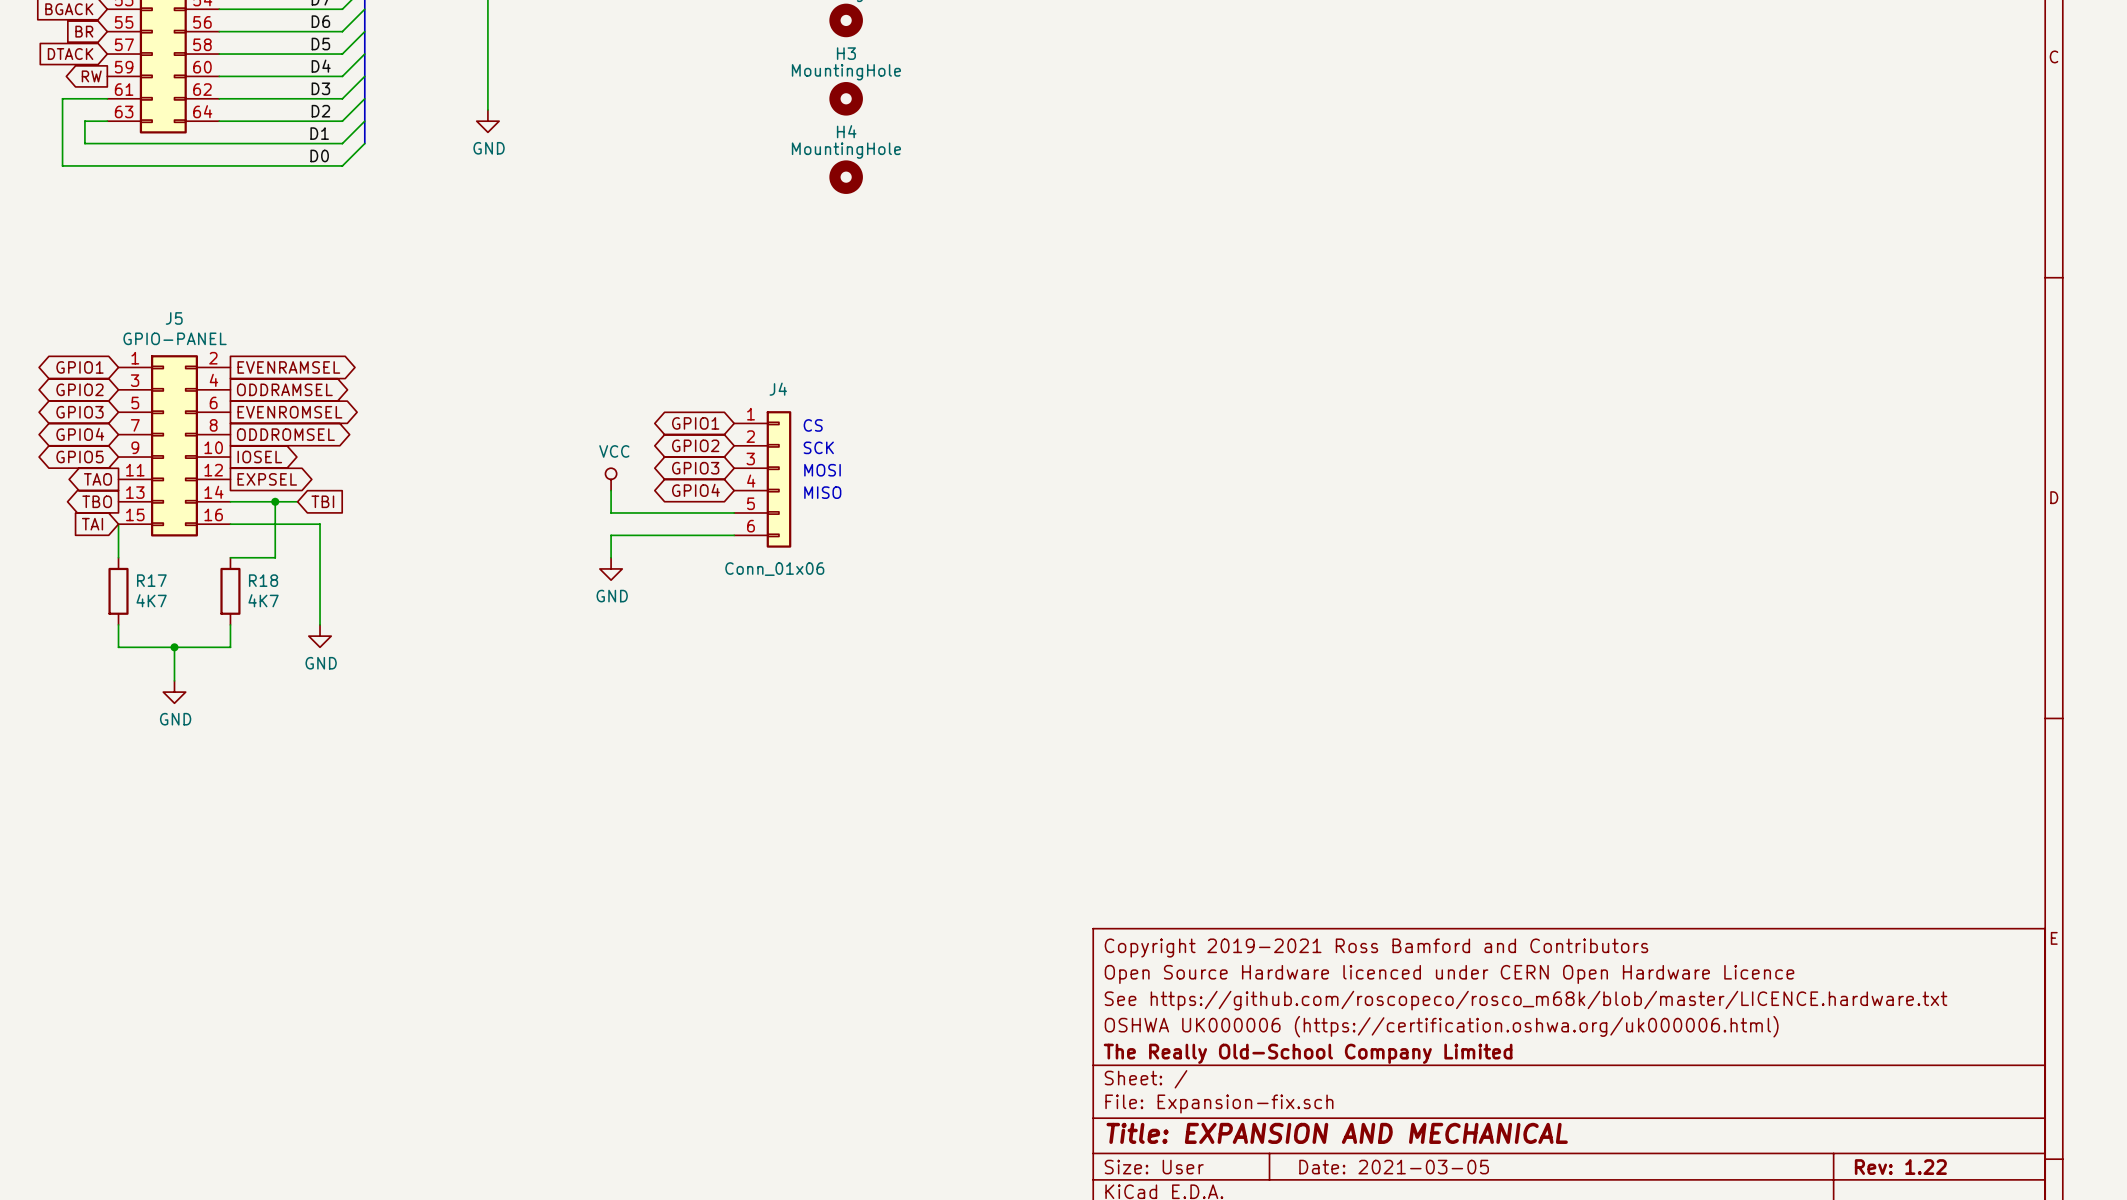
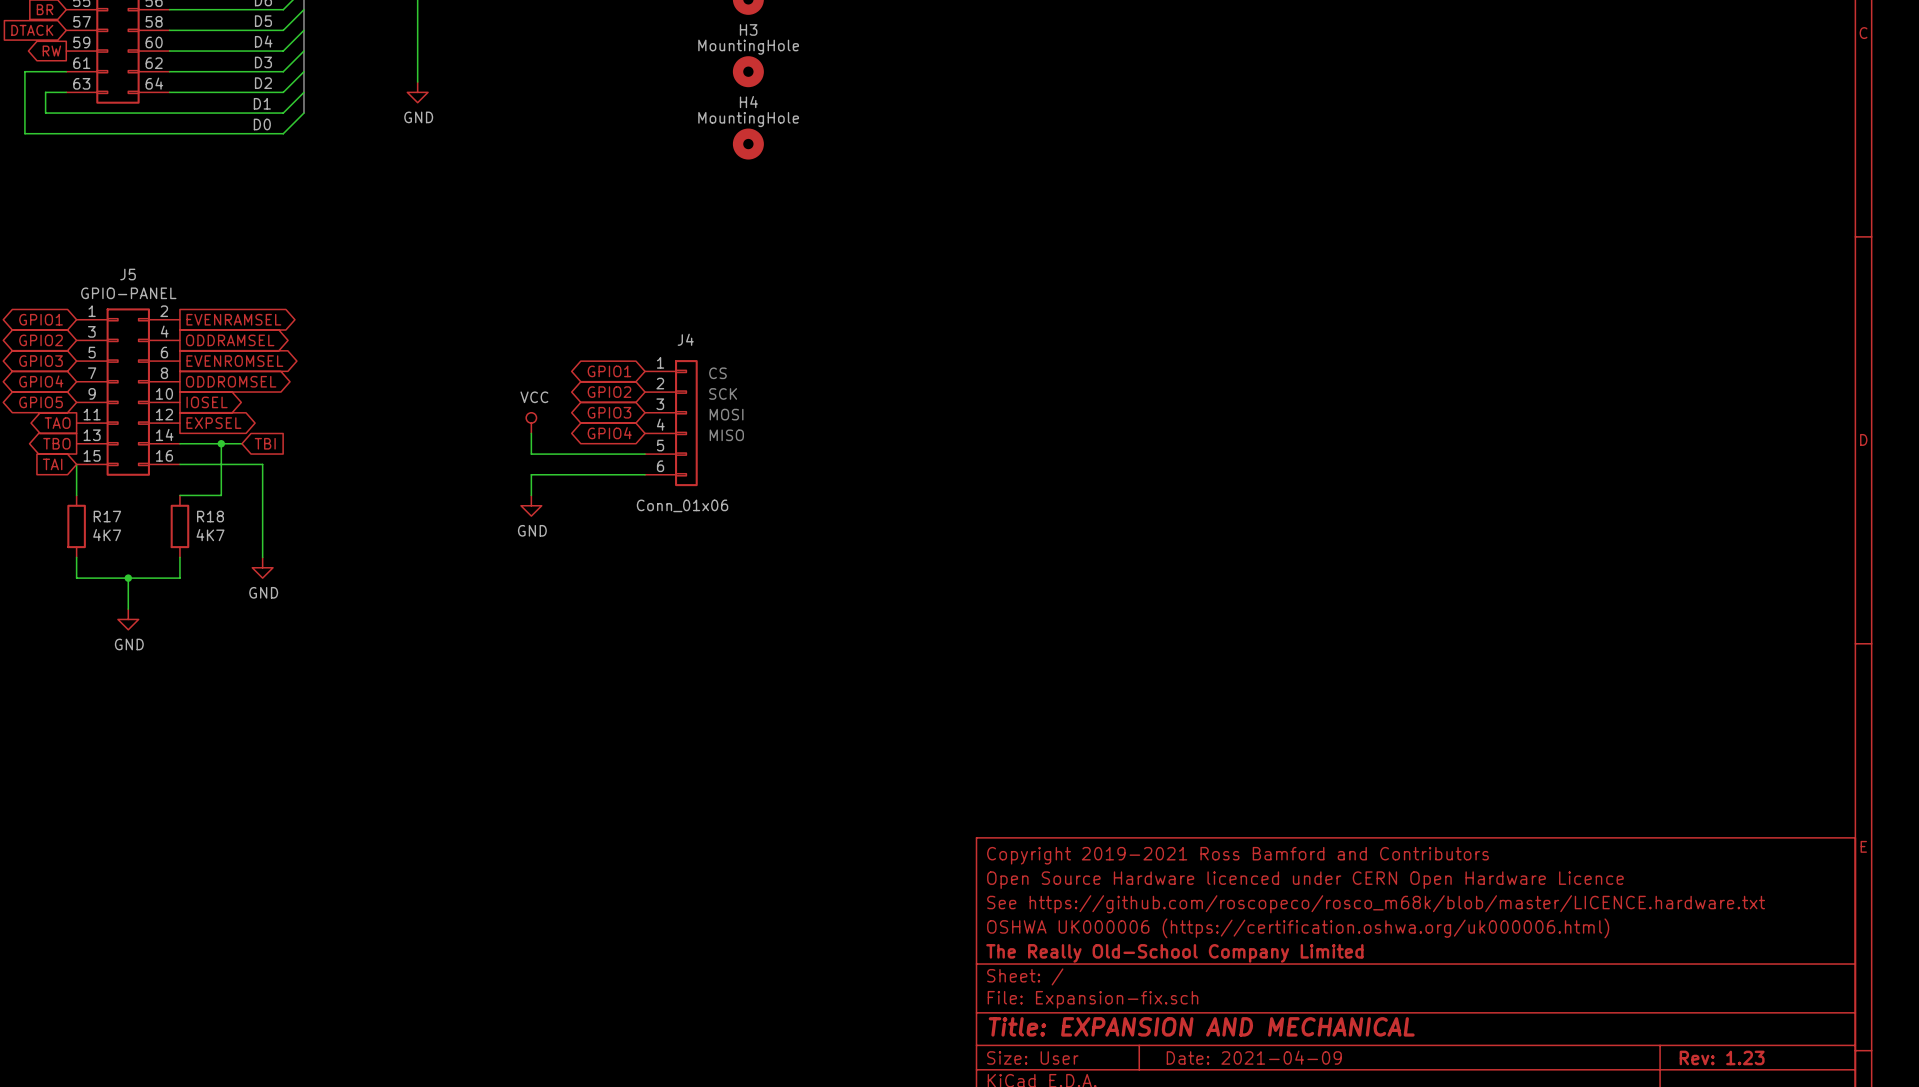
title block: Date: 2021-03-05 (1394, 1167) -> Date: 2021-04-09 (1254, 1057)
title block: Rev: 1.22 (1900, 1167) -> Rev: 1.23 (1722, 1057)

